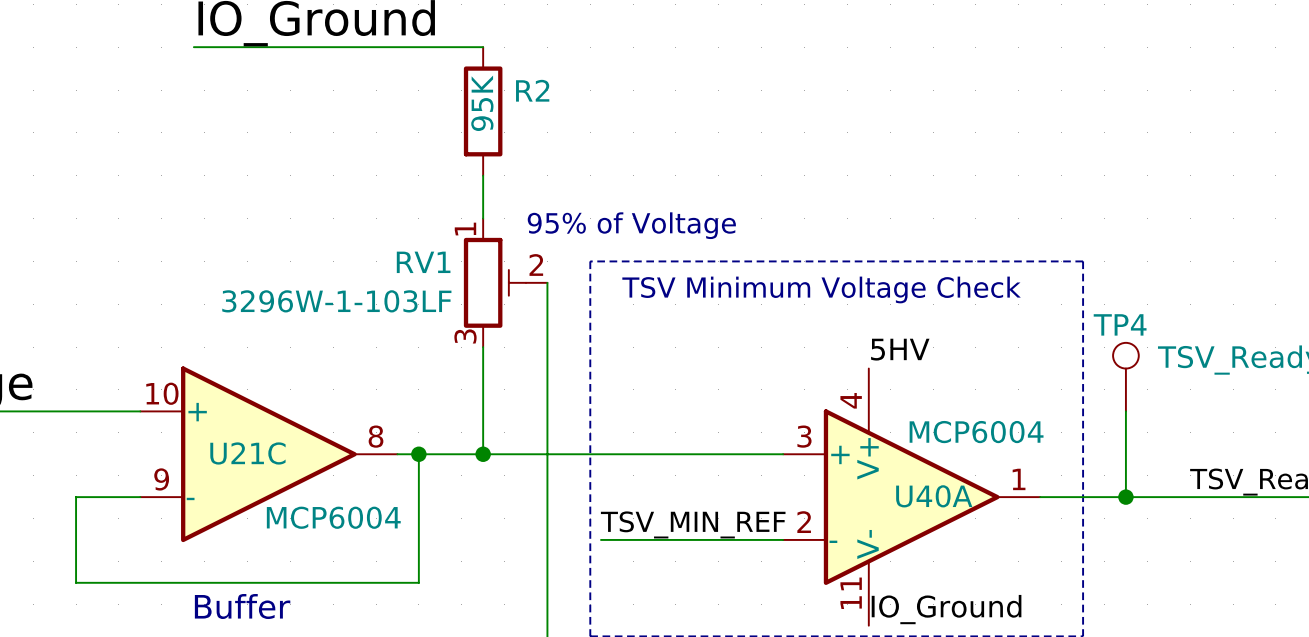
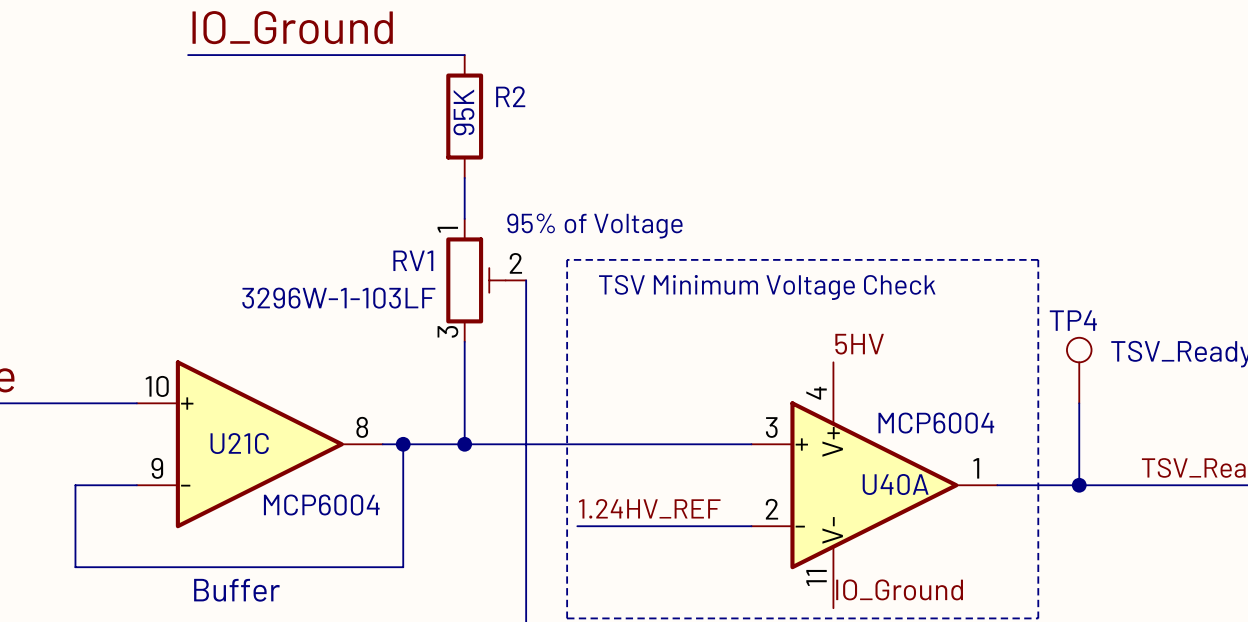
label: TSV_MIN_REF (693, 524) -> 1.24HV_REF (649, 508)

